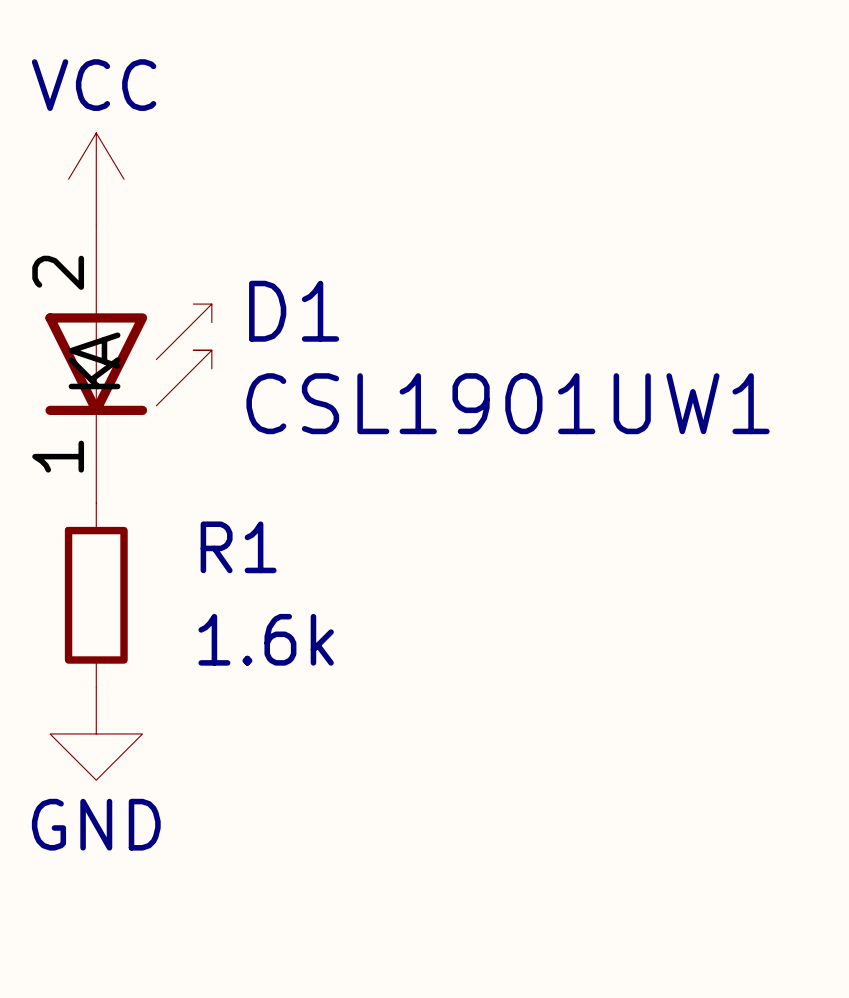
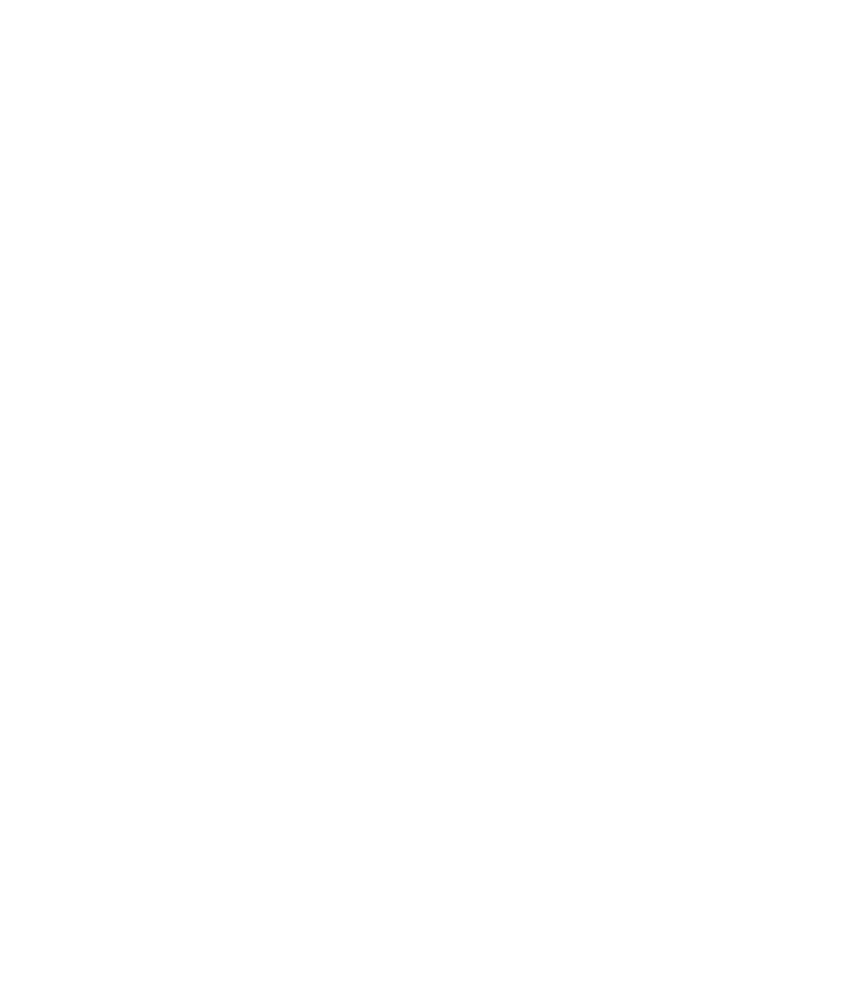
power symbol: VCC (96, 179) -> none
D1: CSL1901UW1 (128, 364) -> none
R1: 1.6k (96, 595) -> none
power symbol: GND (96, 733) -> none

